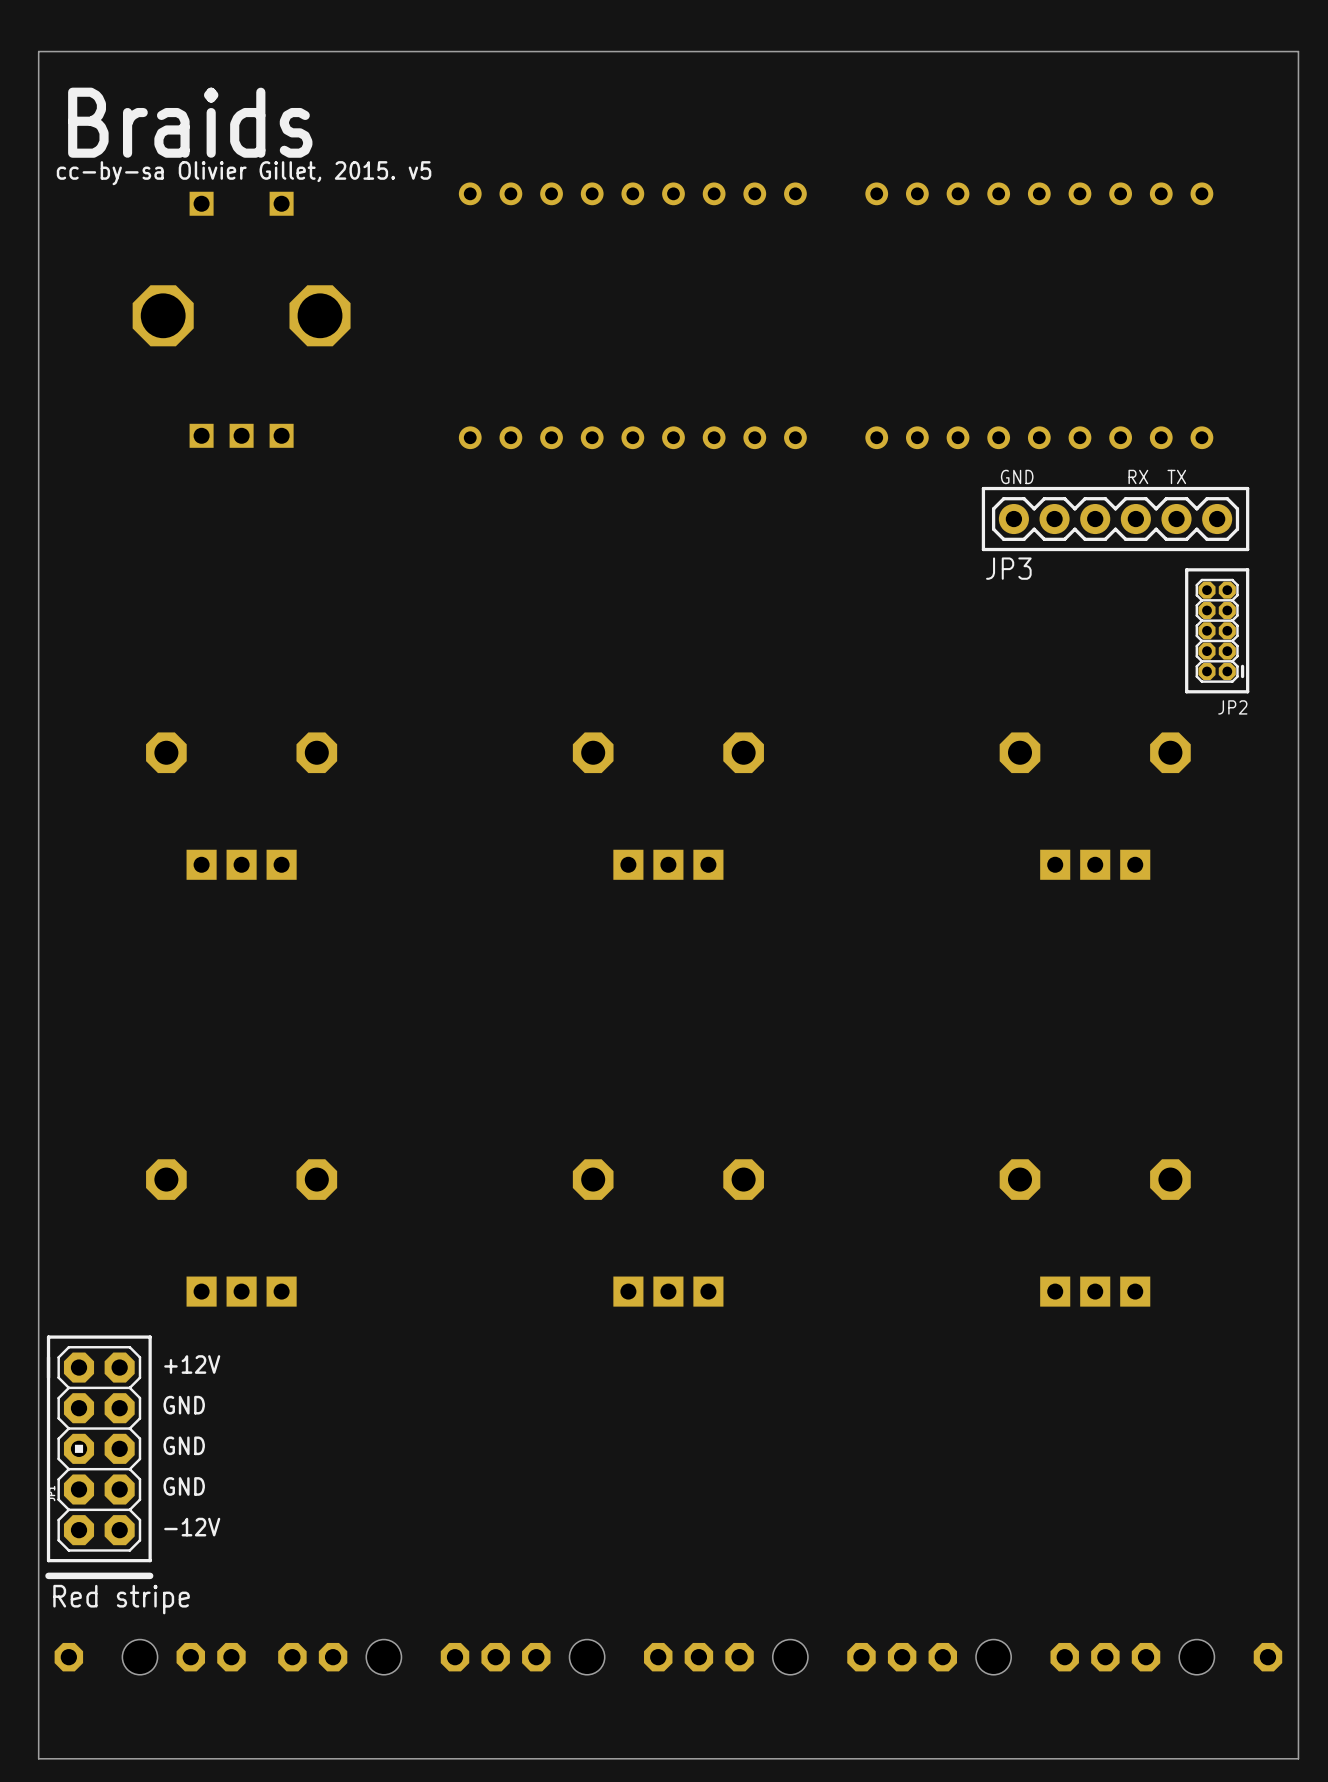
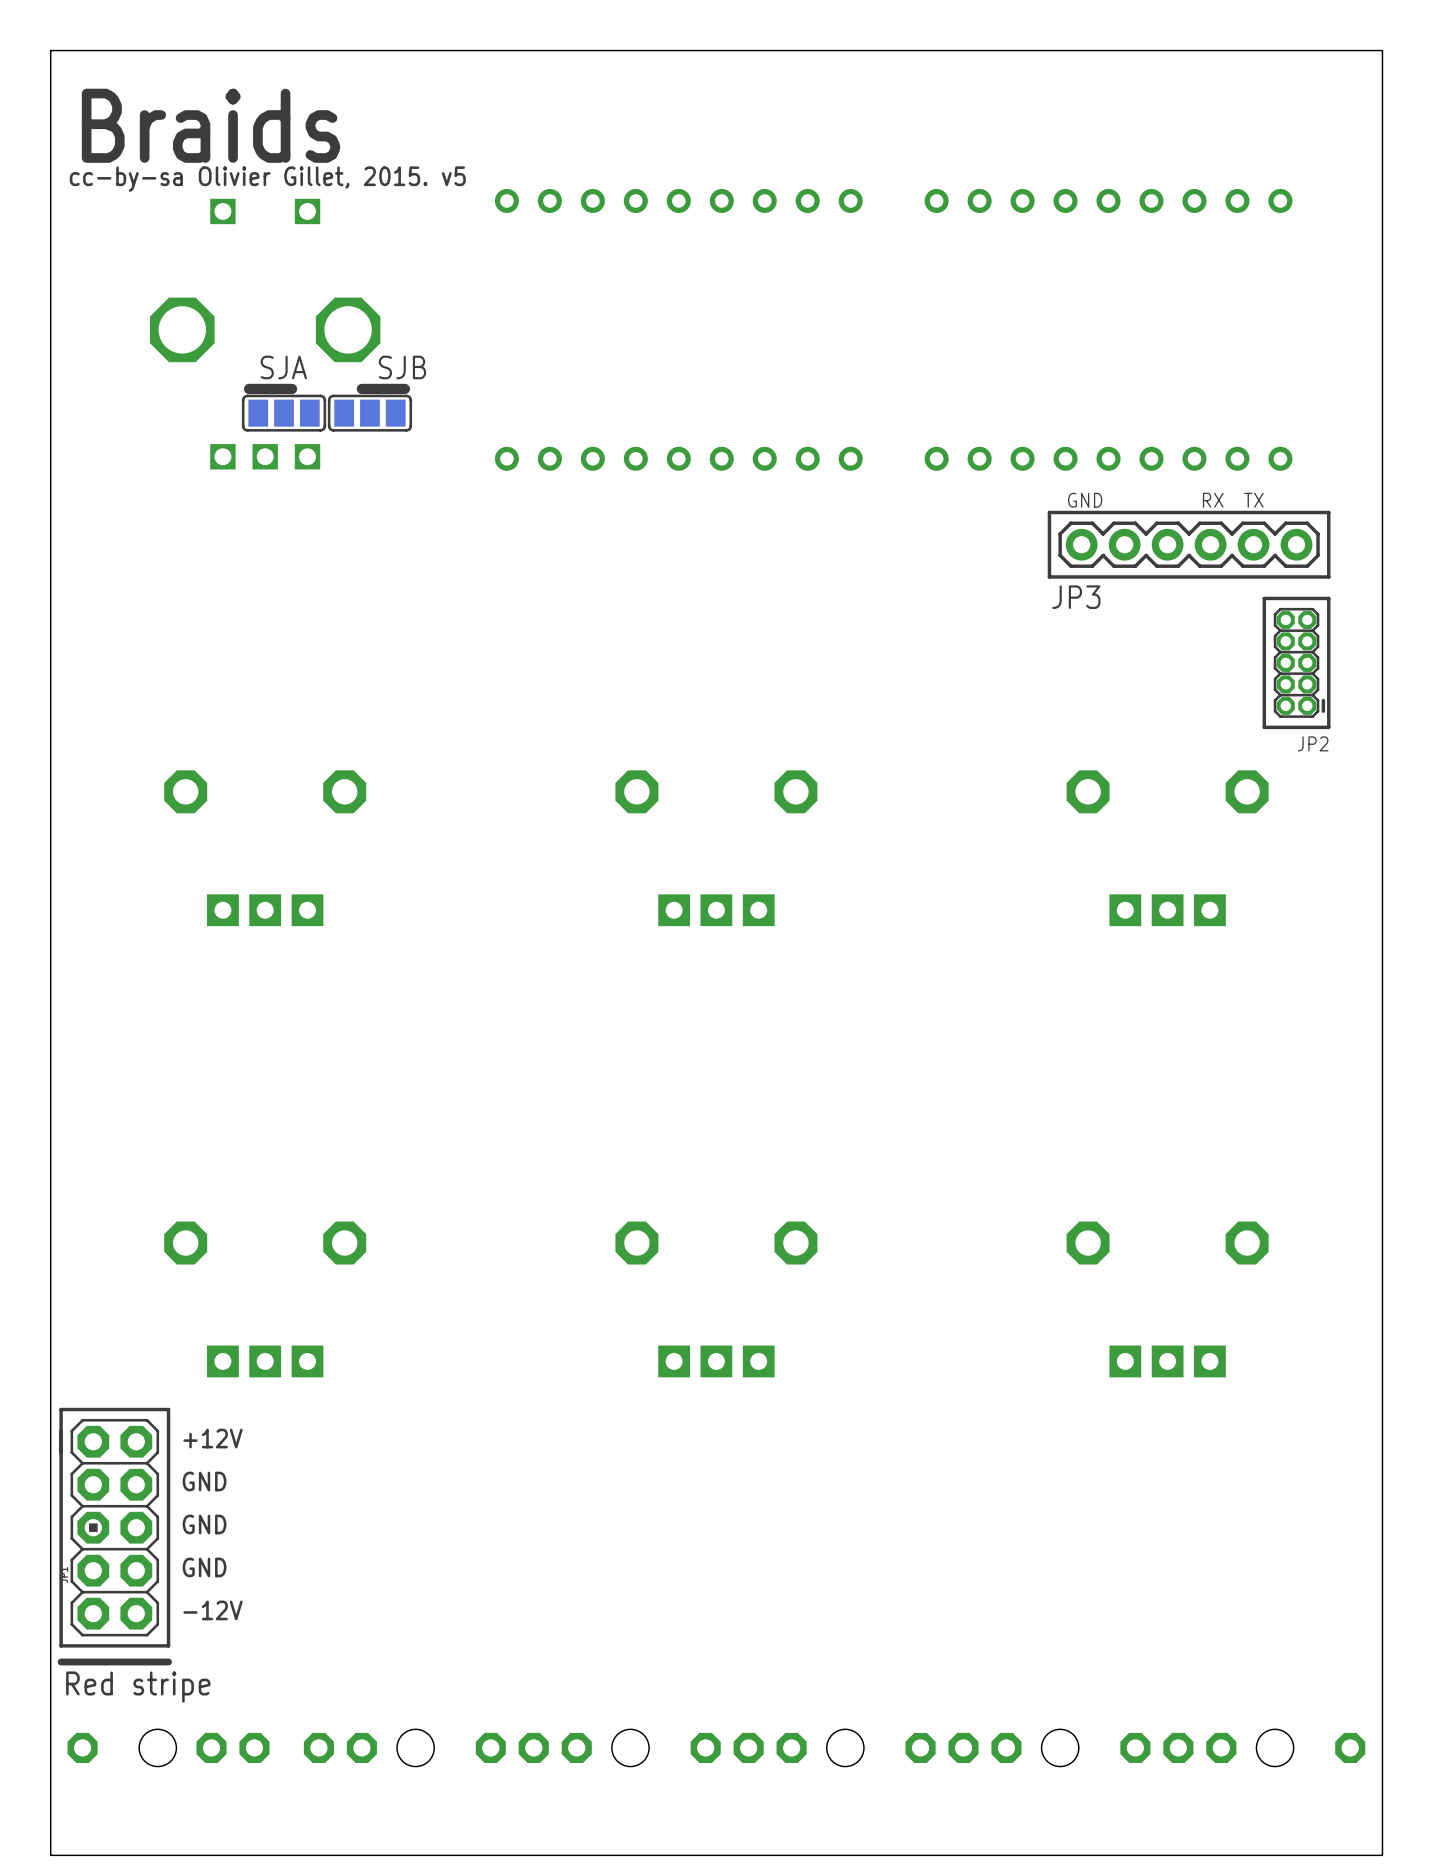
line: none -> (292, 388) (249, 388)
line: none -> (404, 388) (361, 388)
SJA: none -> (284, 413)
SJB: none -> (369, 413)

